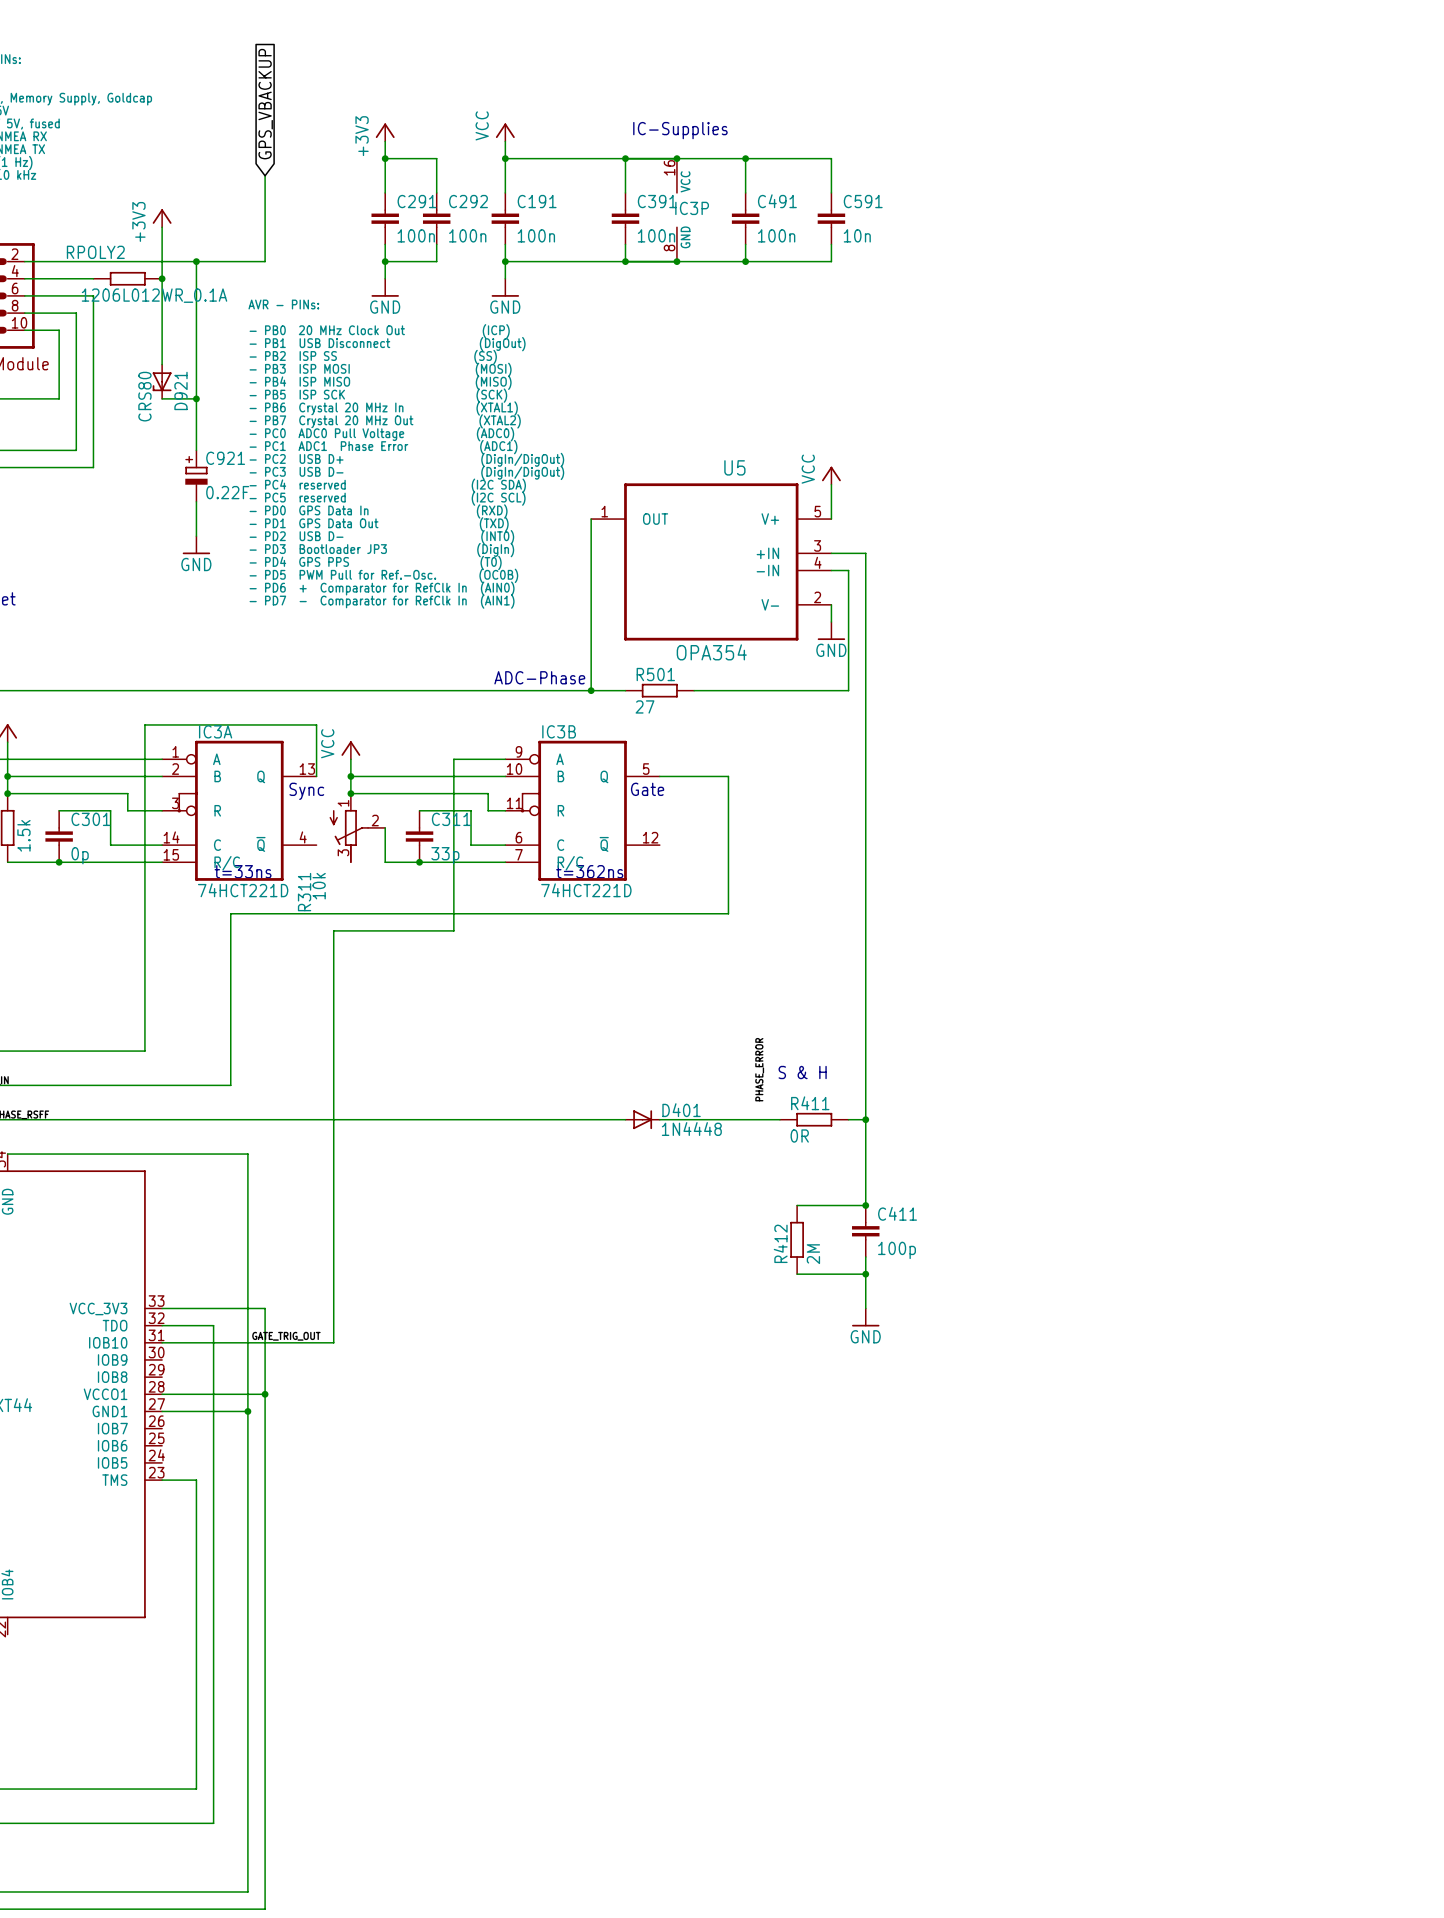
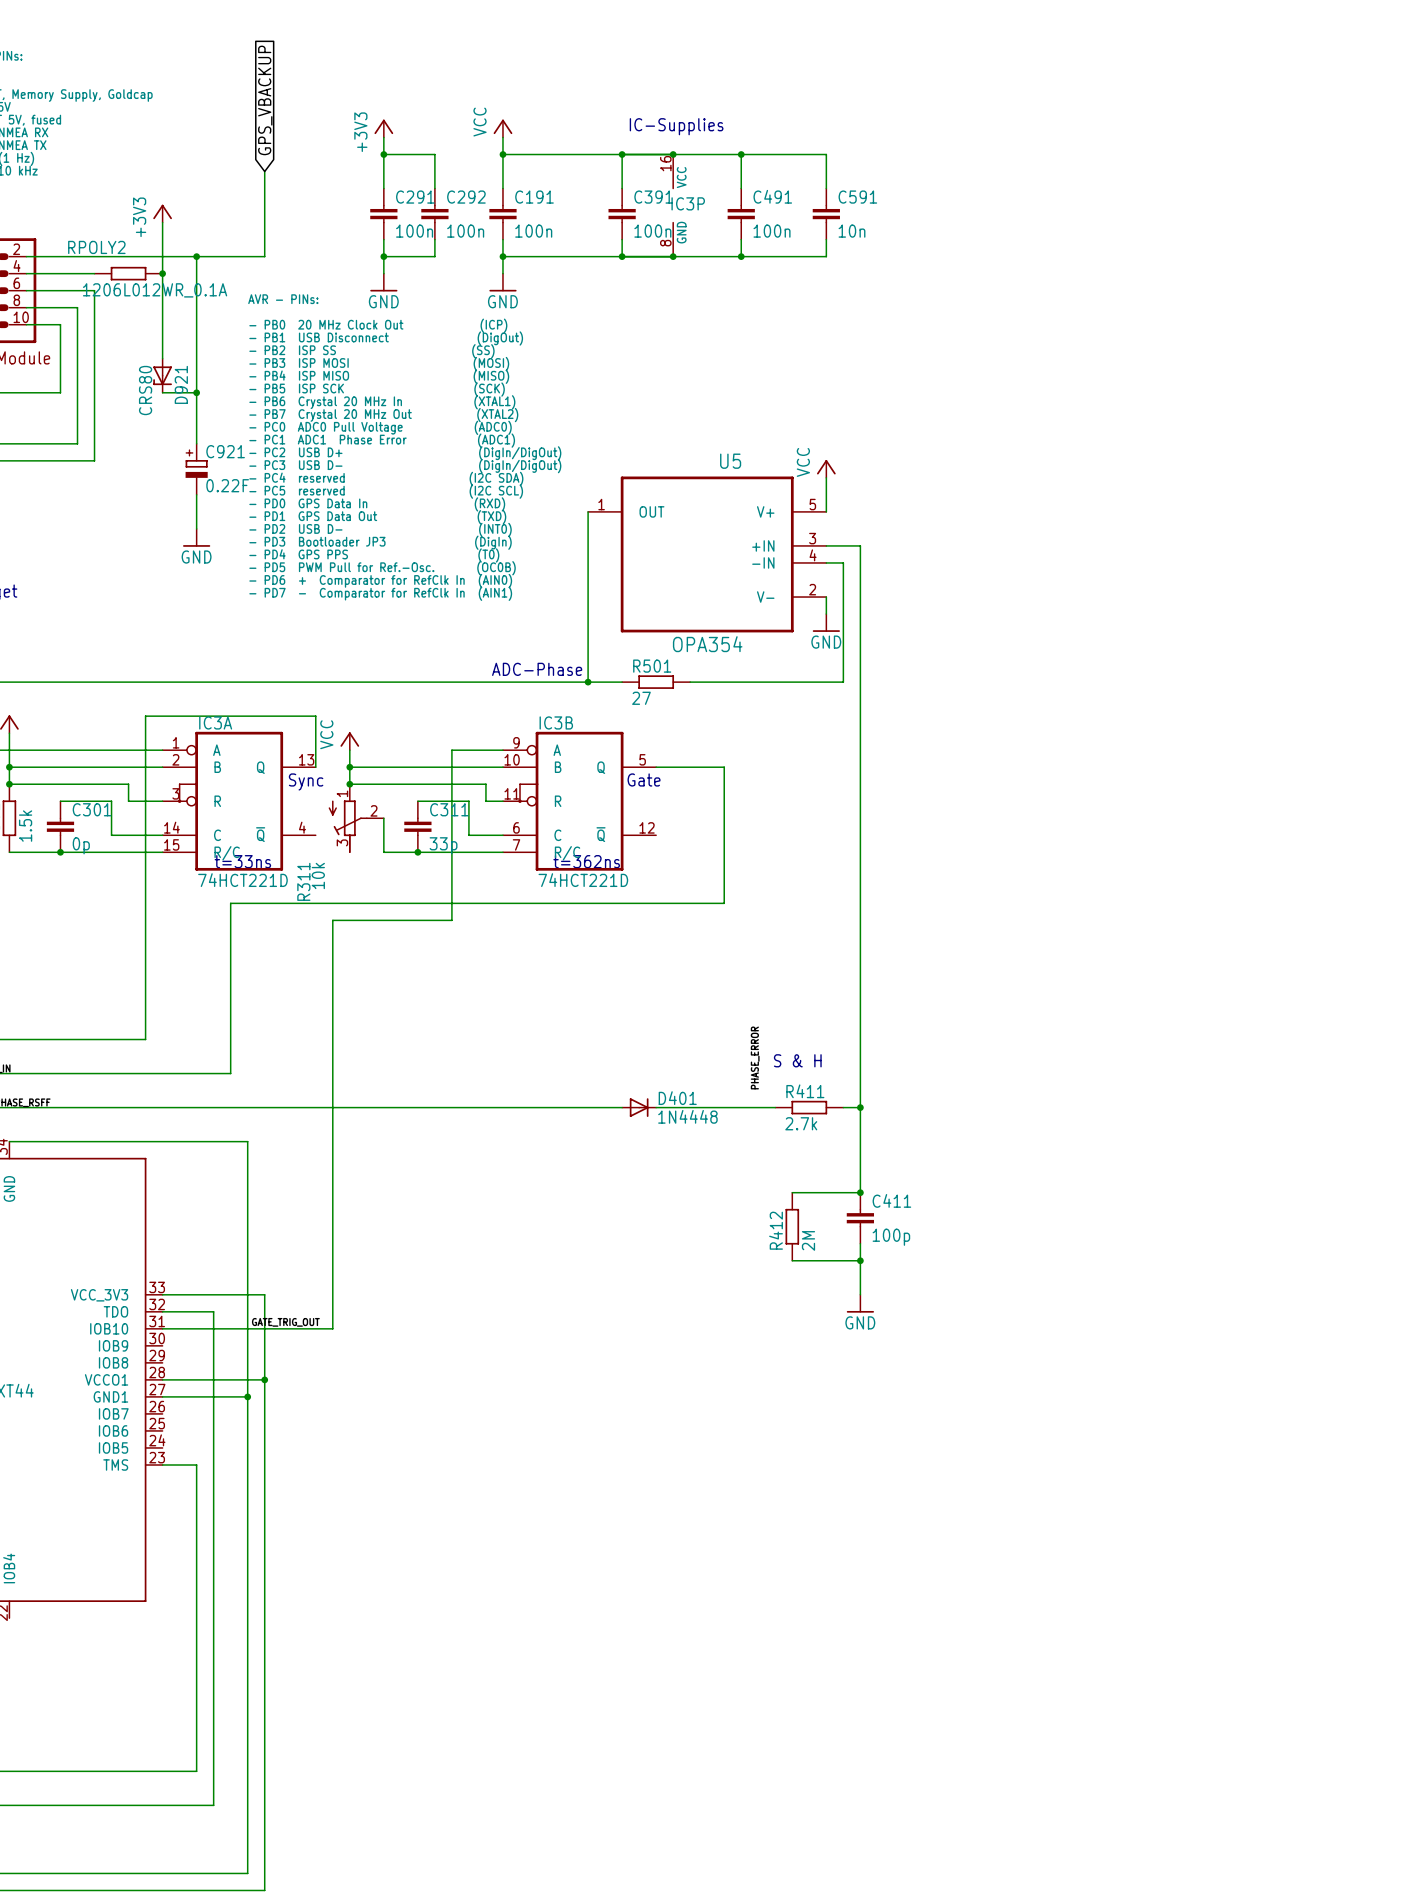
R411 value: 0R (799, 1136) -> 2.7k (801, 1123)

